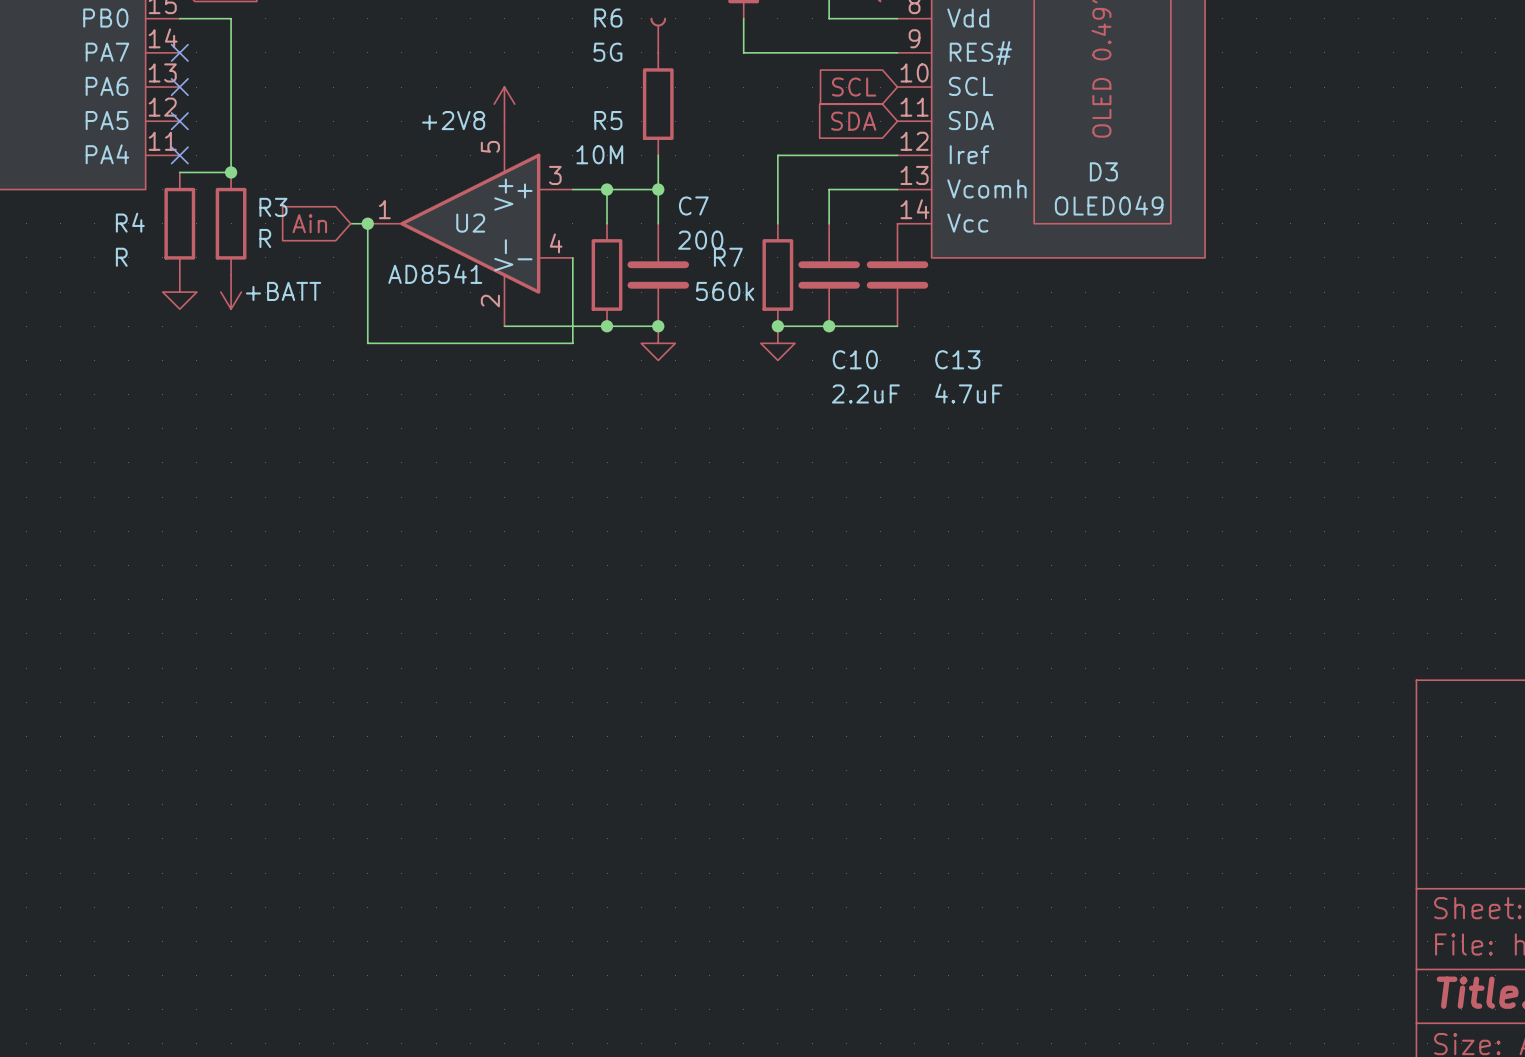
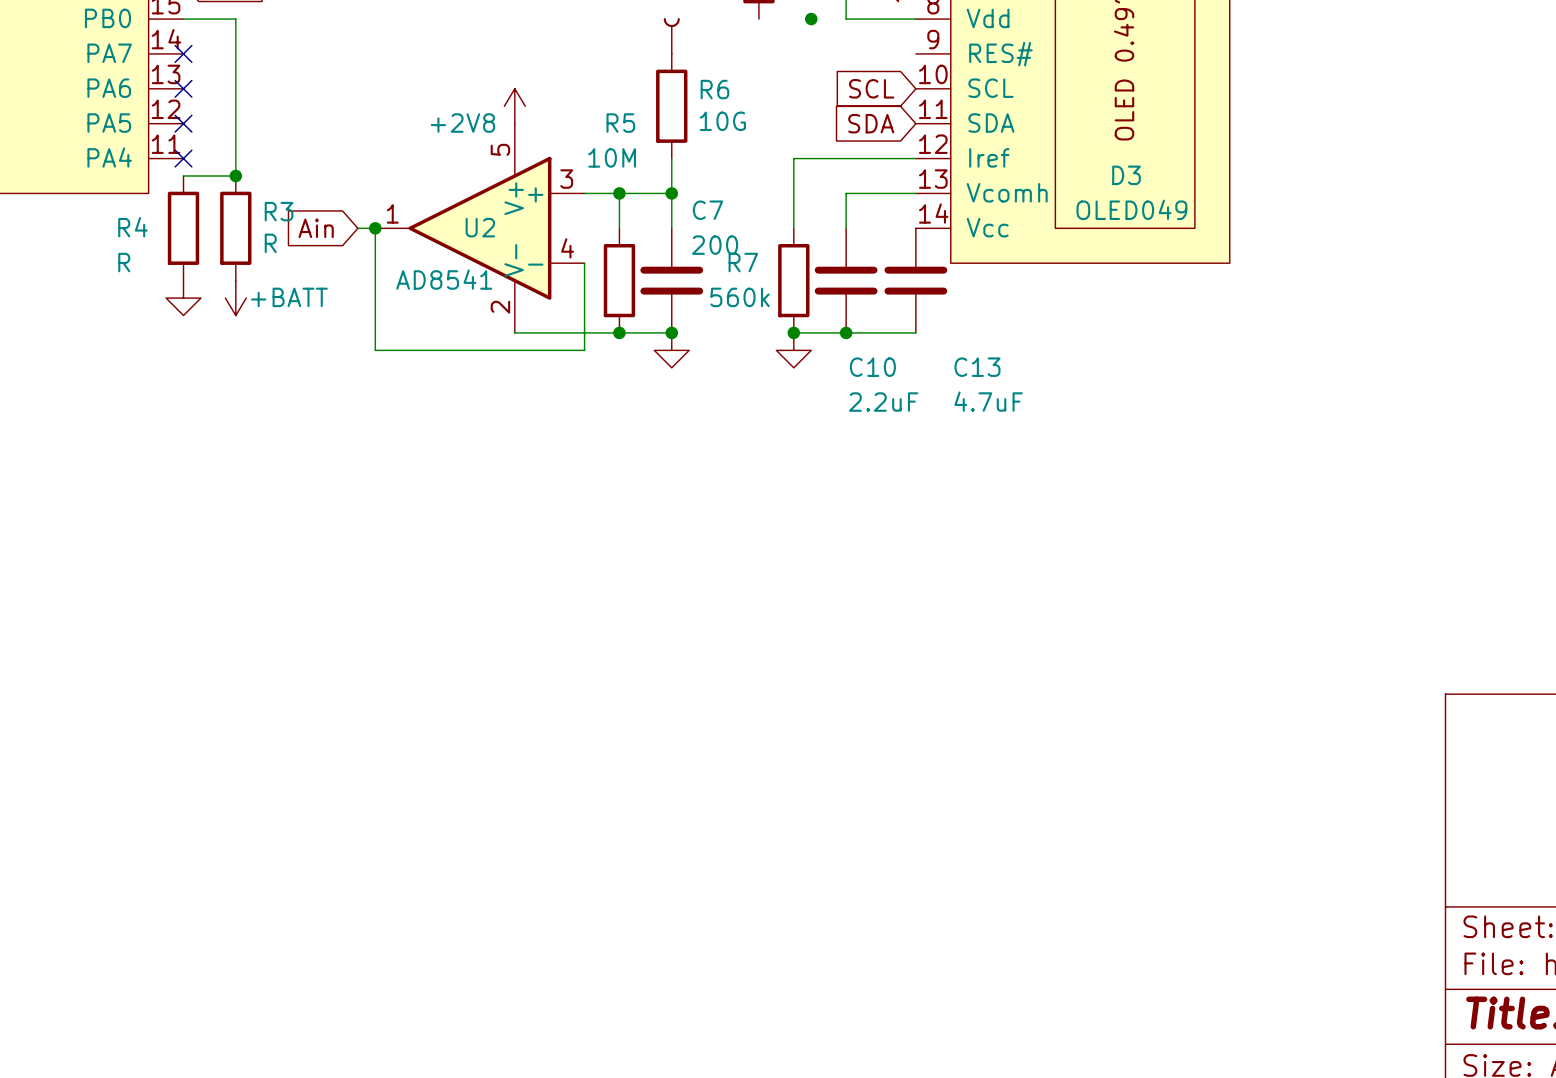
R6 name position: R6 (608, 18) -> R6 (714, 89)
wire: (743, 18) (743, 52) (897, 52) -> none
junction: none -> (811, 19)
R6 value: 5G (607, 52) -> 10G (722, 121)

